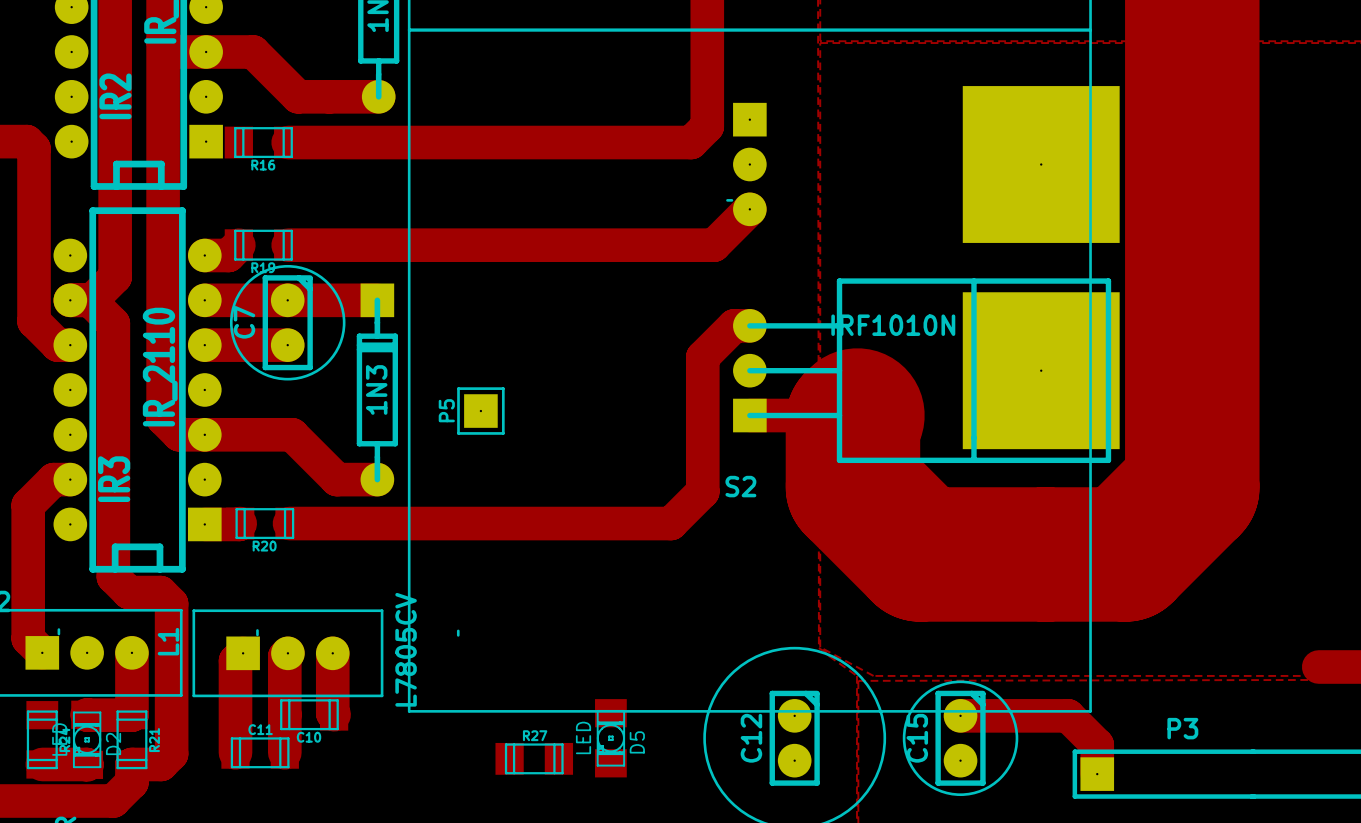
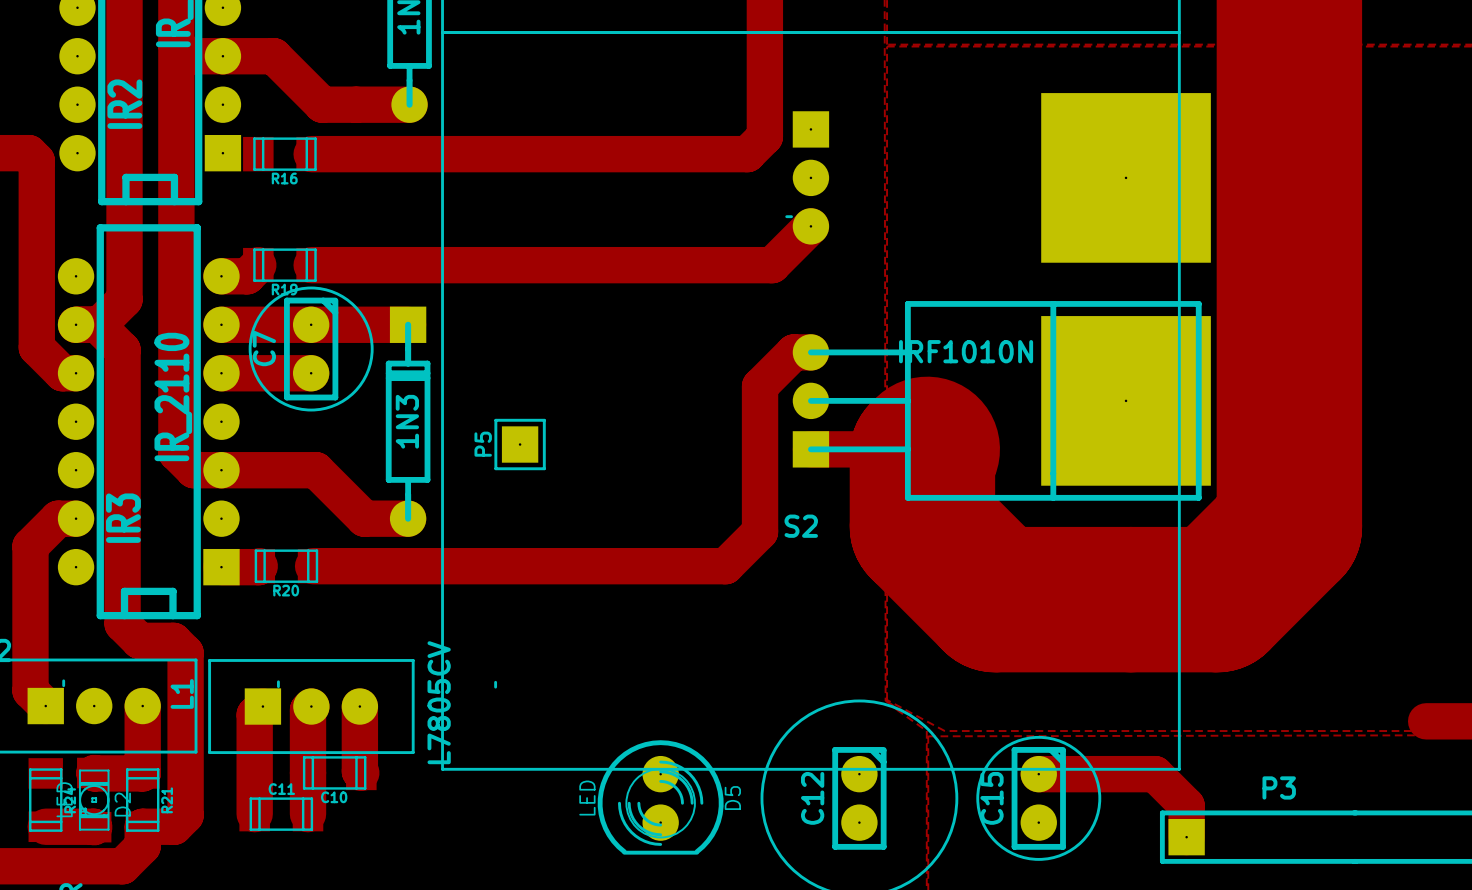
D5 footprint: [595, 699, 627, 778] -> [597, 740, 724, 855]
D5 value position: LED (583, 737) -> LED (587, 798)
D5 name position: D5 (637, 742) -> D5 (732, 798)
R27: (534, 758) -> none

